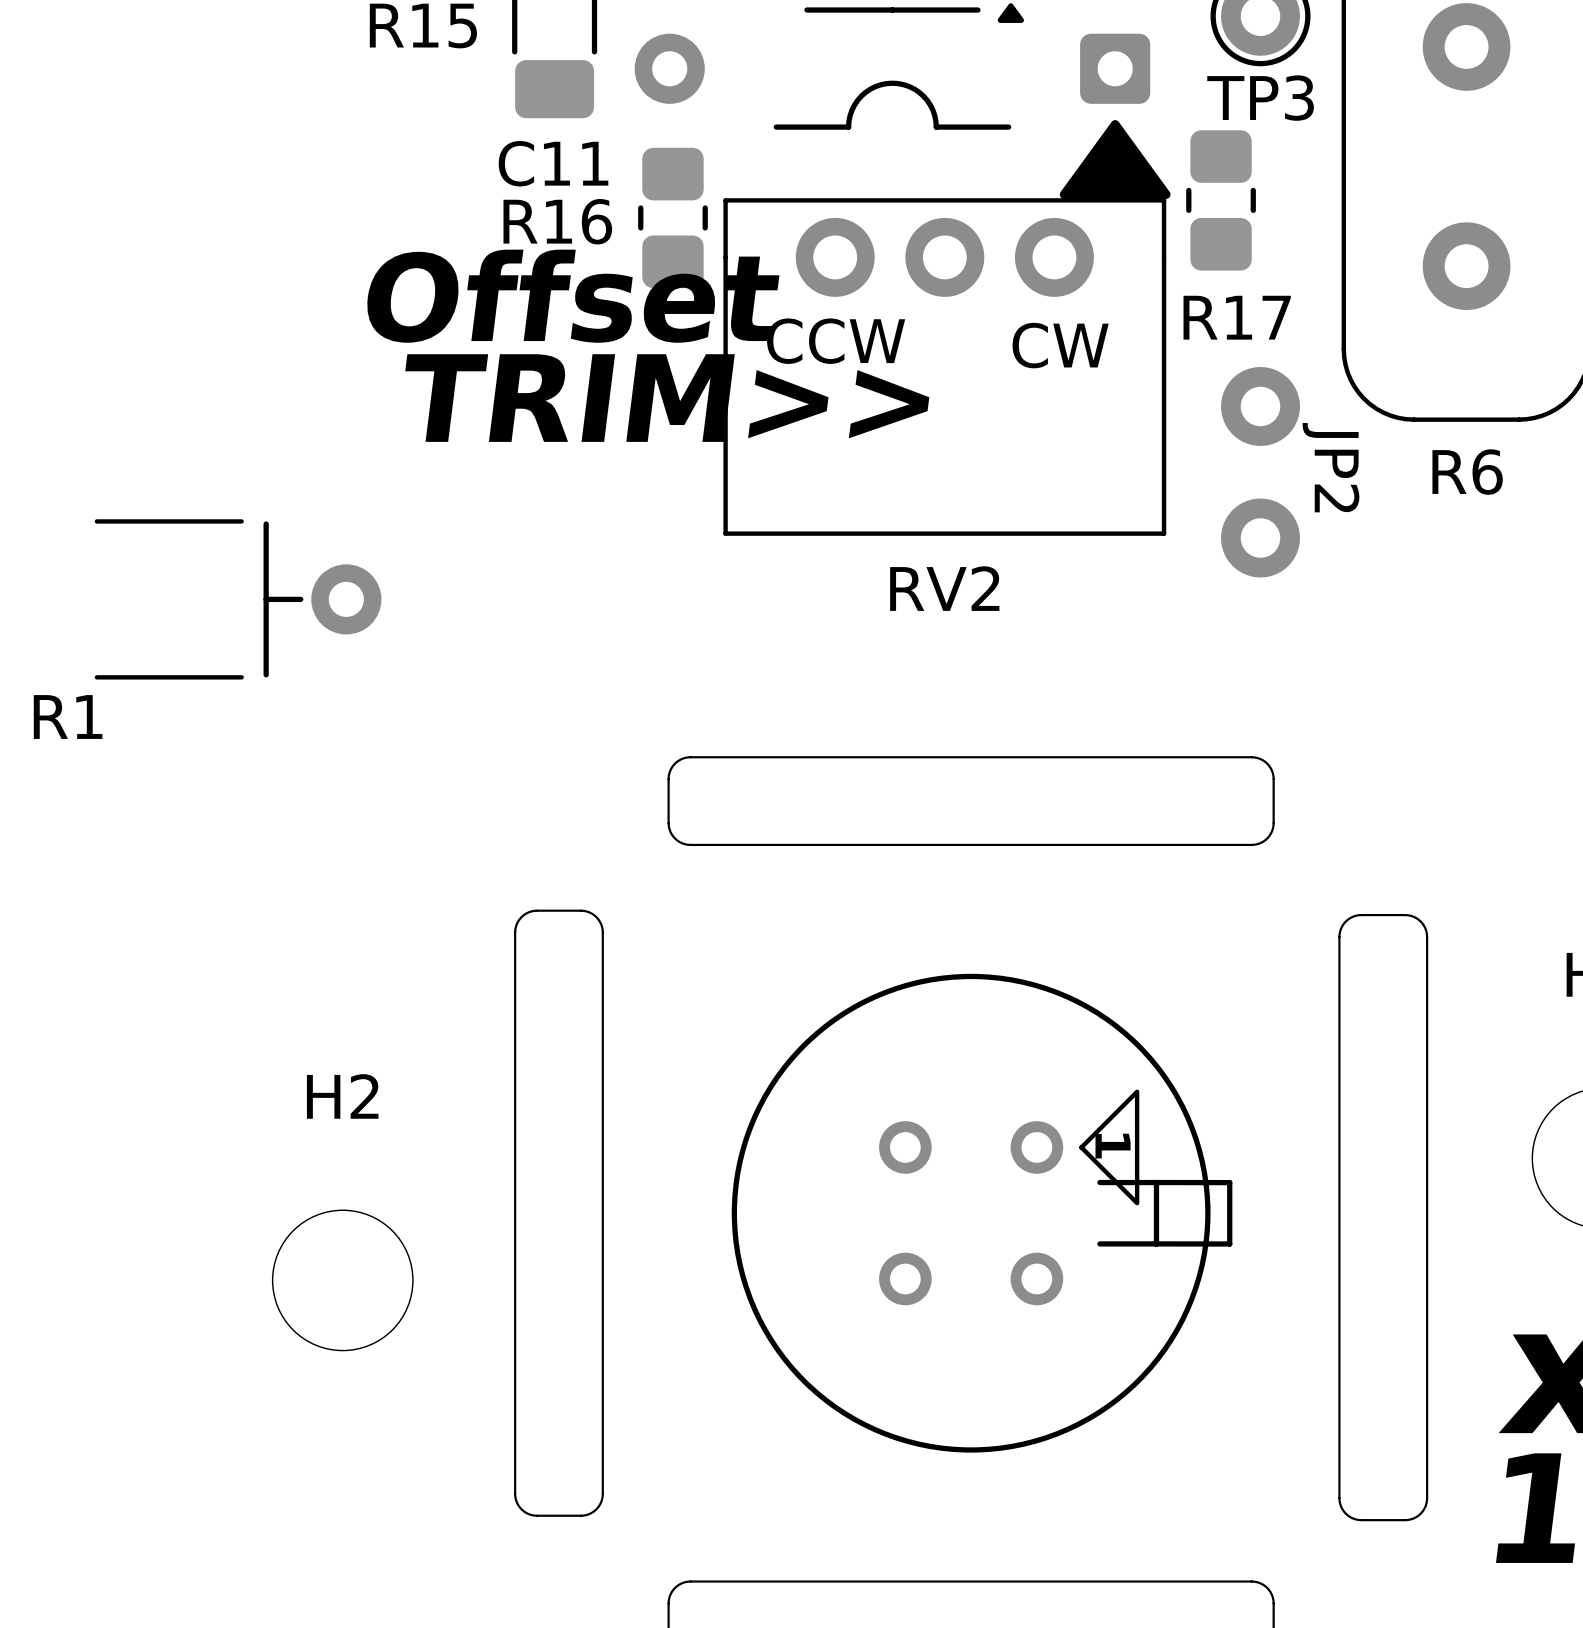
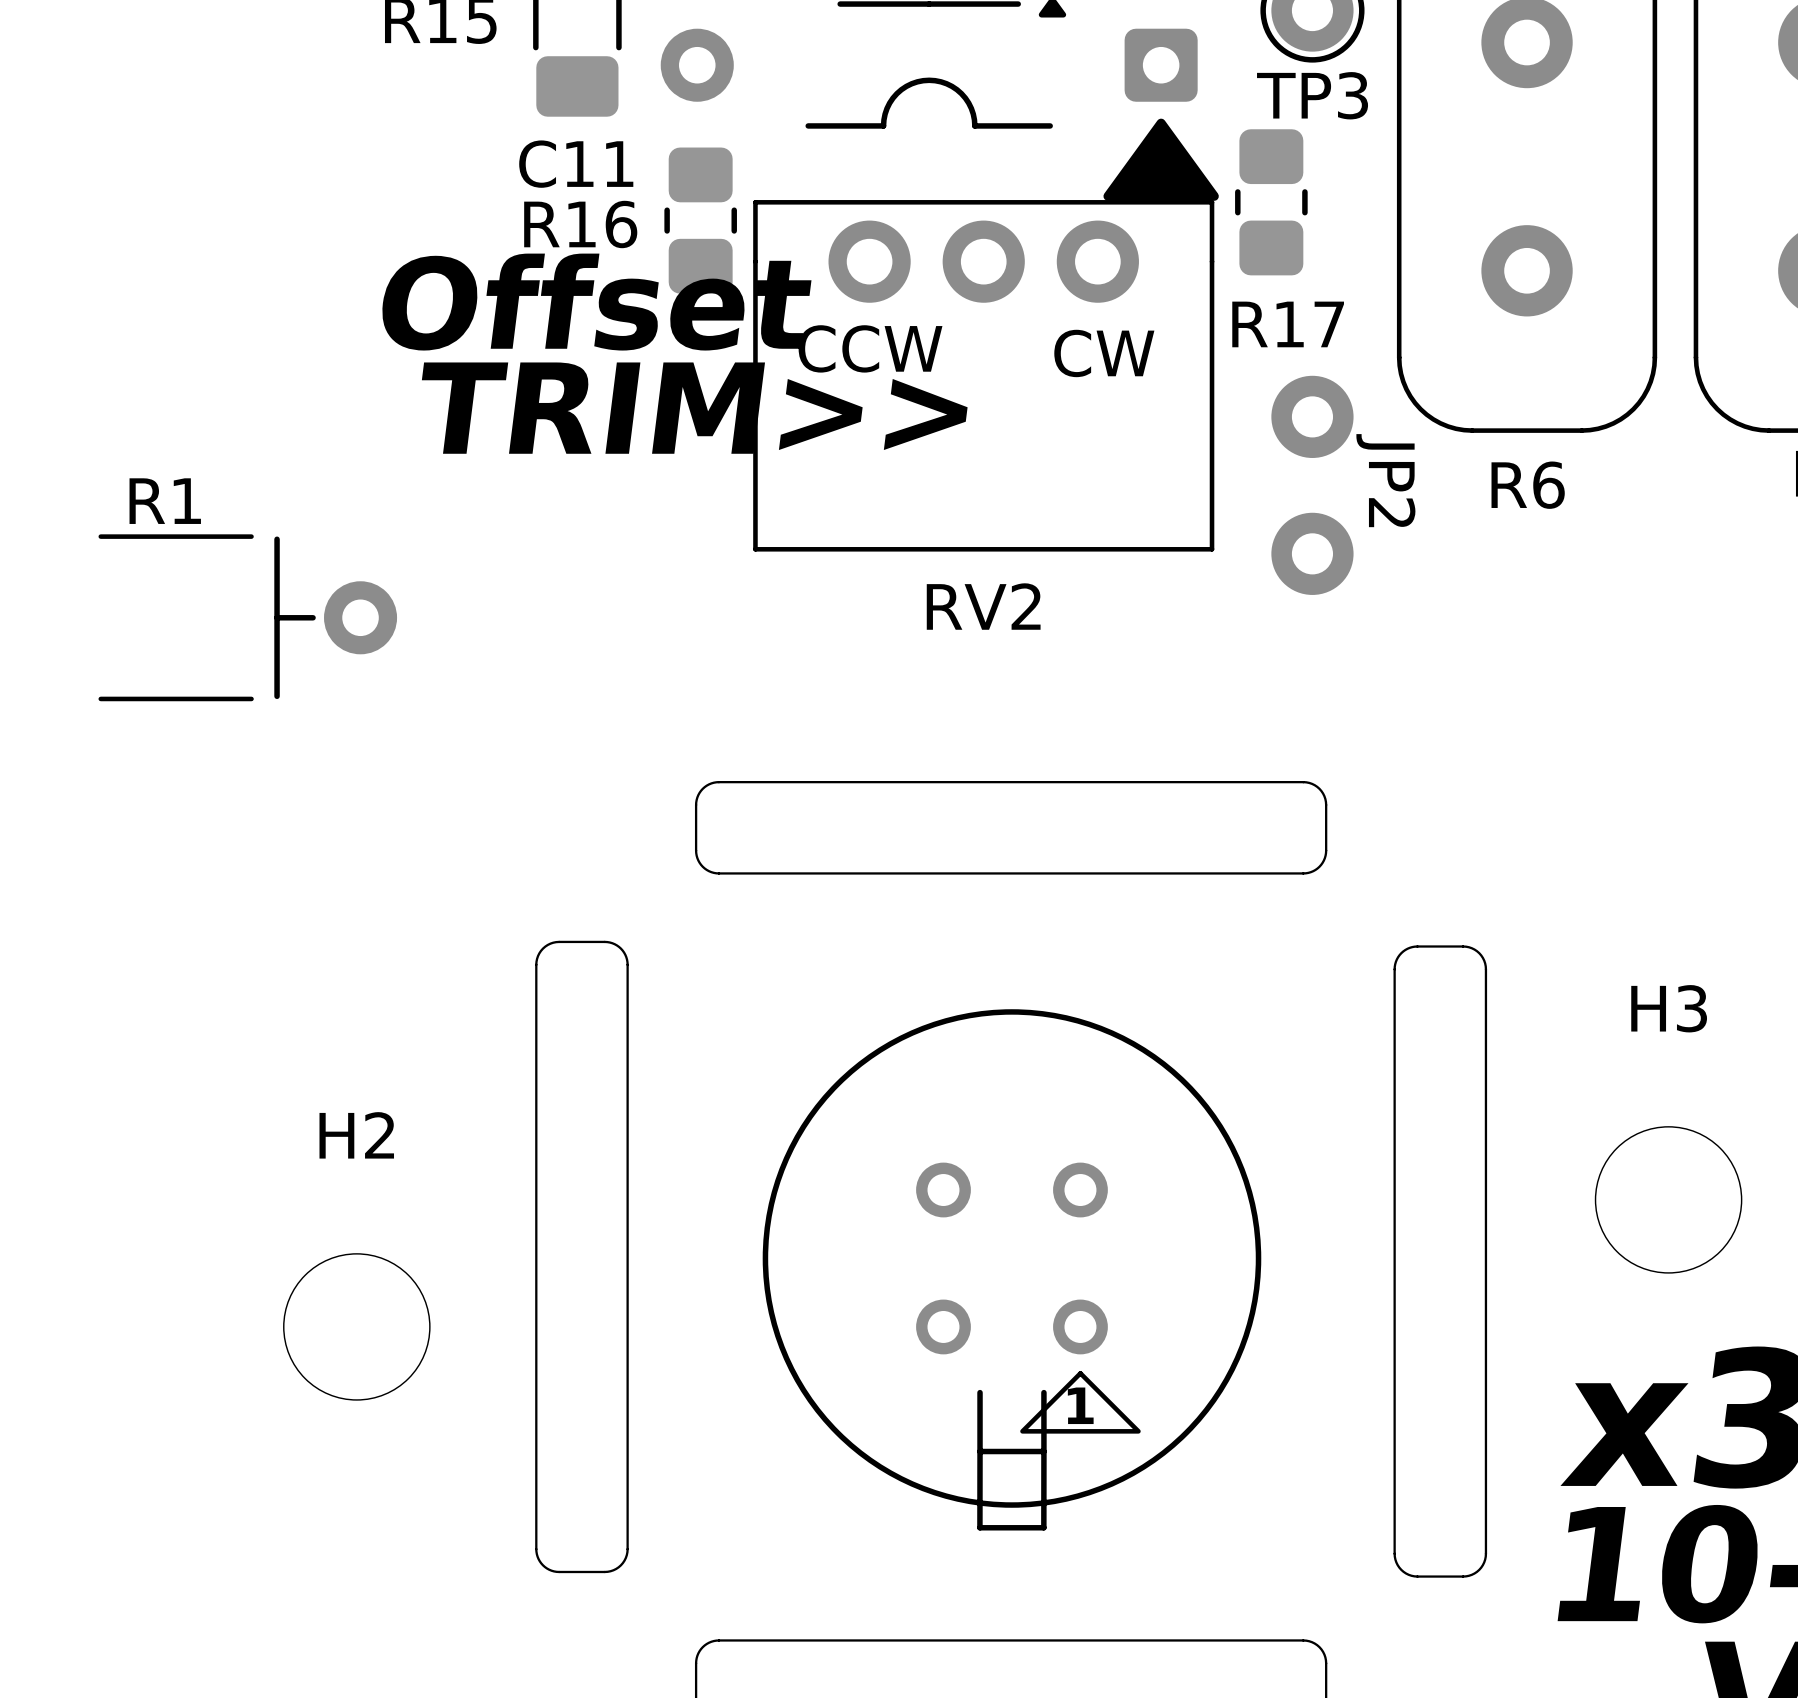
R1 name position: R1 (68, 717) -> R1 (165, 501)
part footprint: [731, 973, 1233, 1453] -> [762, 1009, 1262, 1531]

